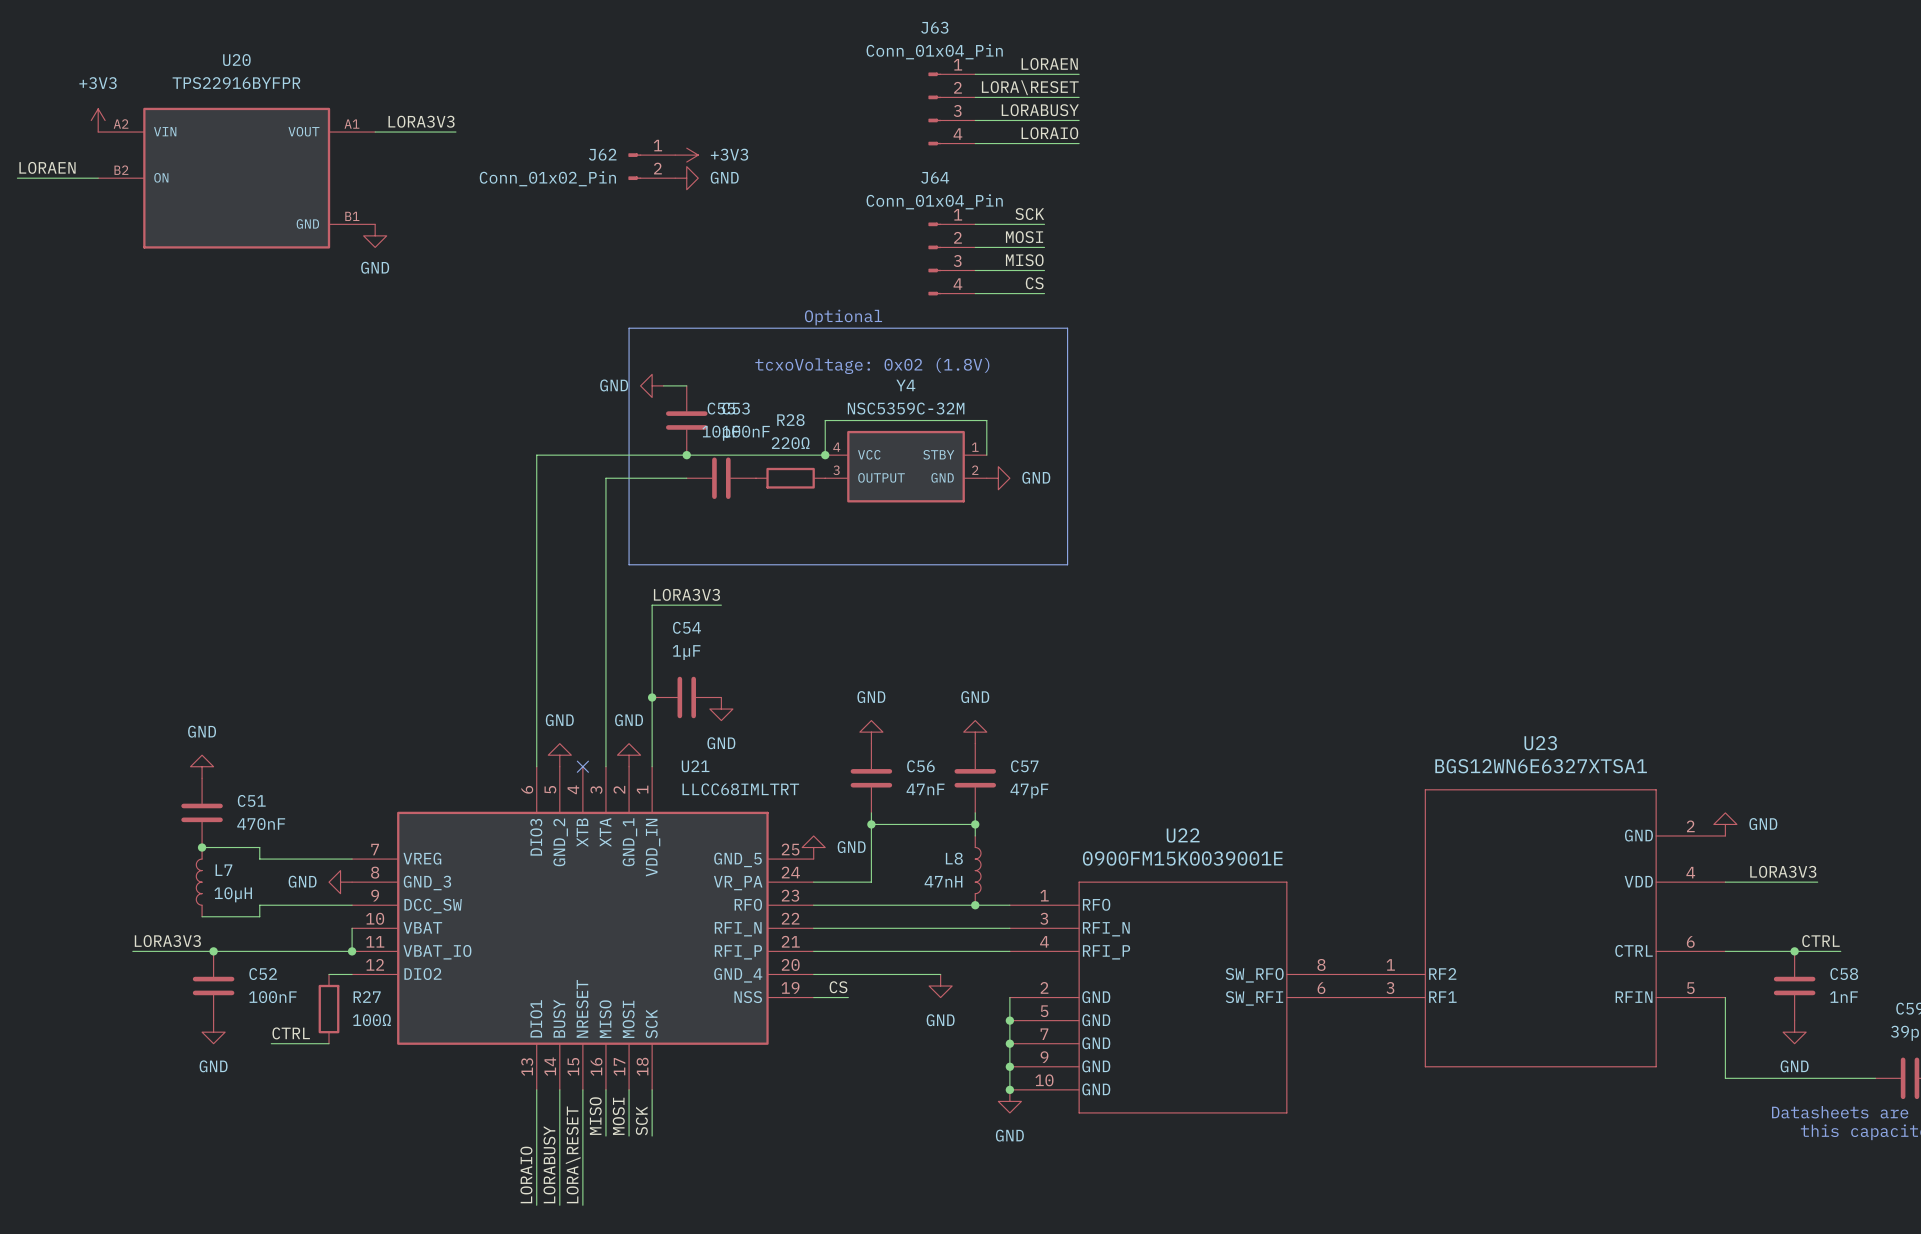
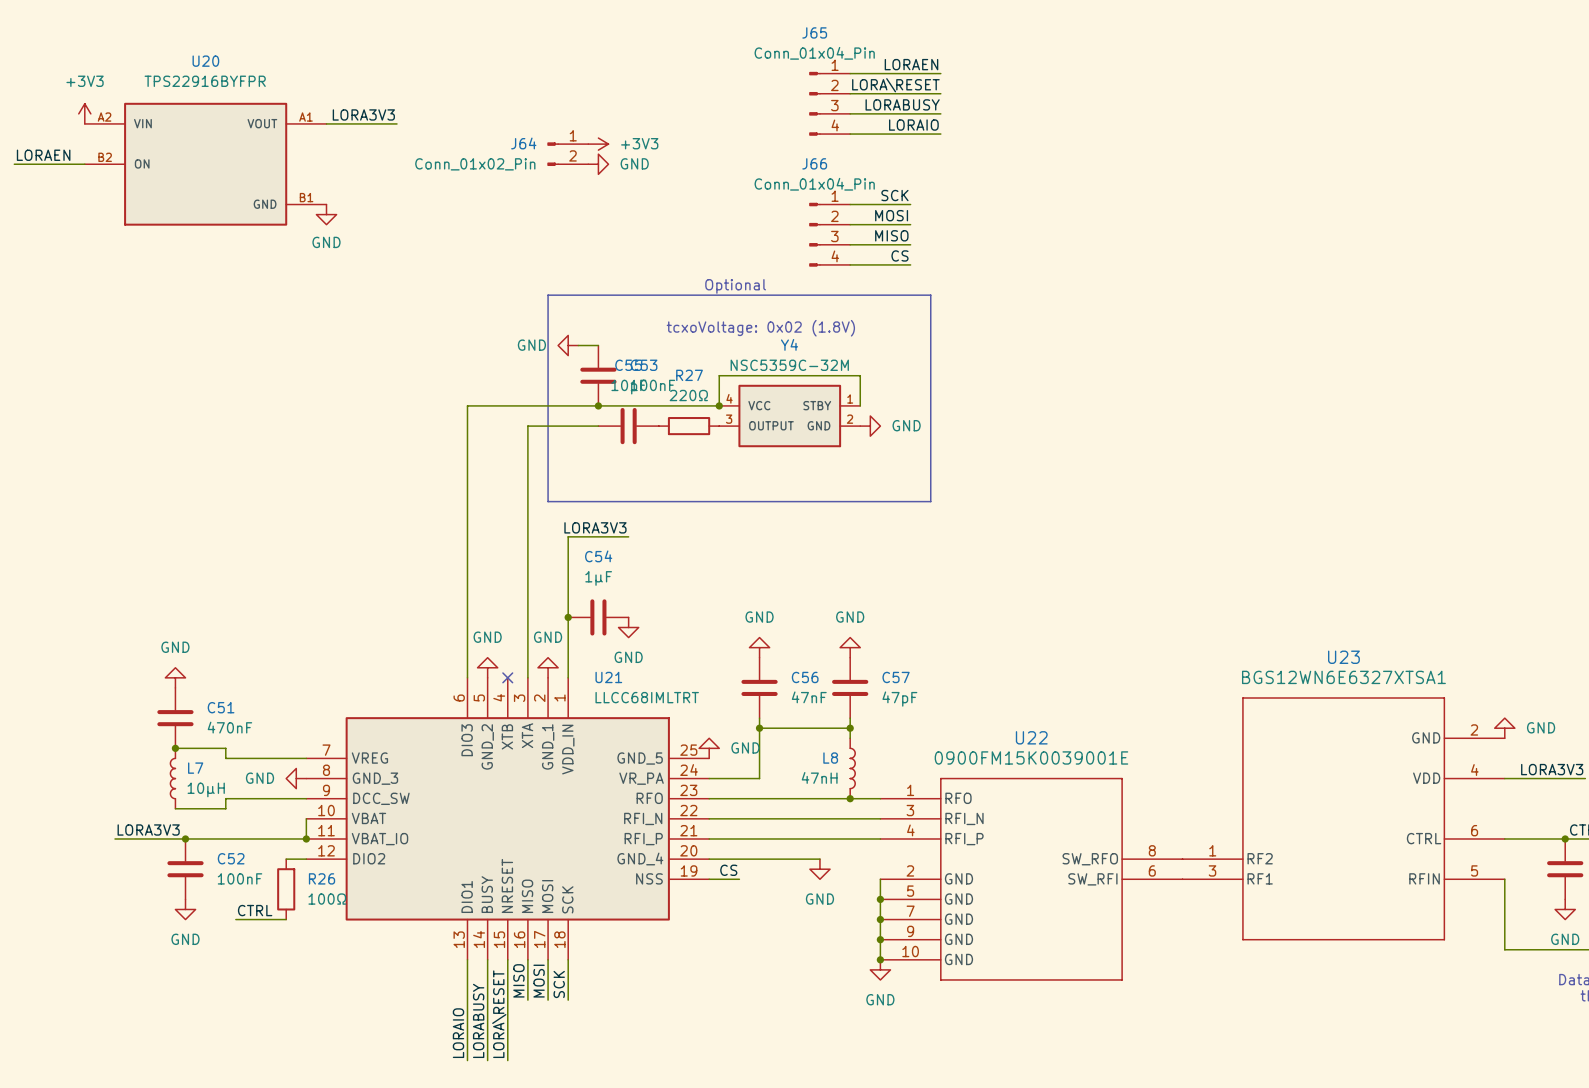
J63 name: J63 (934, 27) -> J65 (814, 32)
J62 name: J62 (602, 154) -> J64 (523, 143)
J64 name: J64 (935, 177) -> J66 (814, 163)
R28 name: R28 (790, 420) -> R27 (689, 375)
R27 name: R27 (367, 997) -> R26 (322, 878)

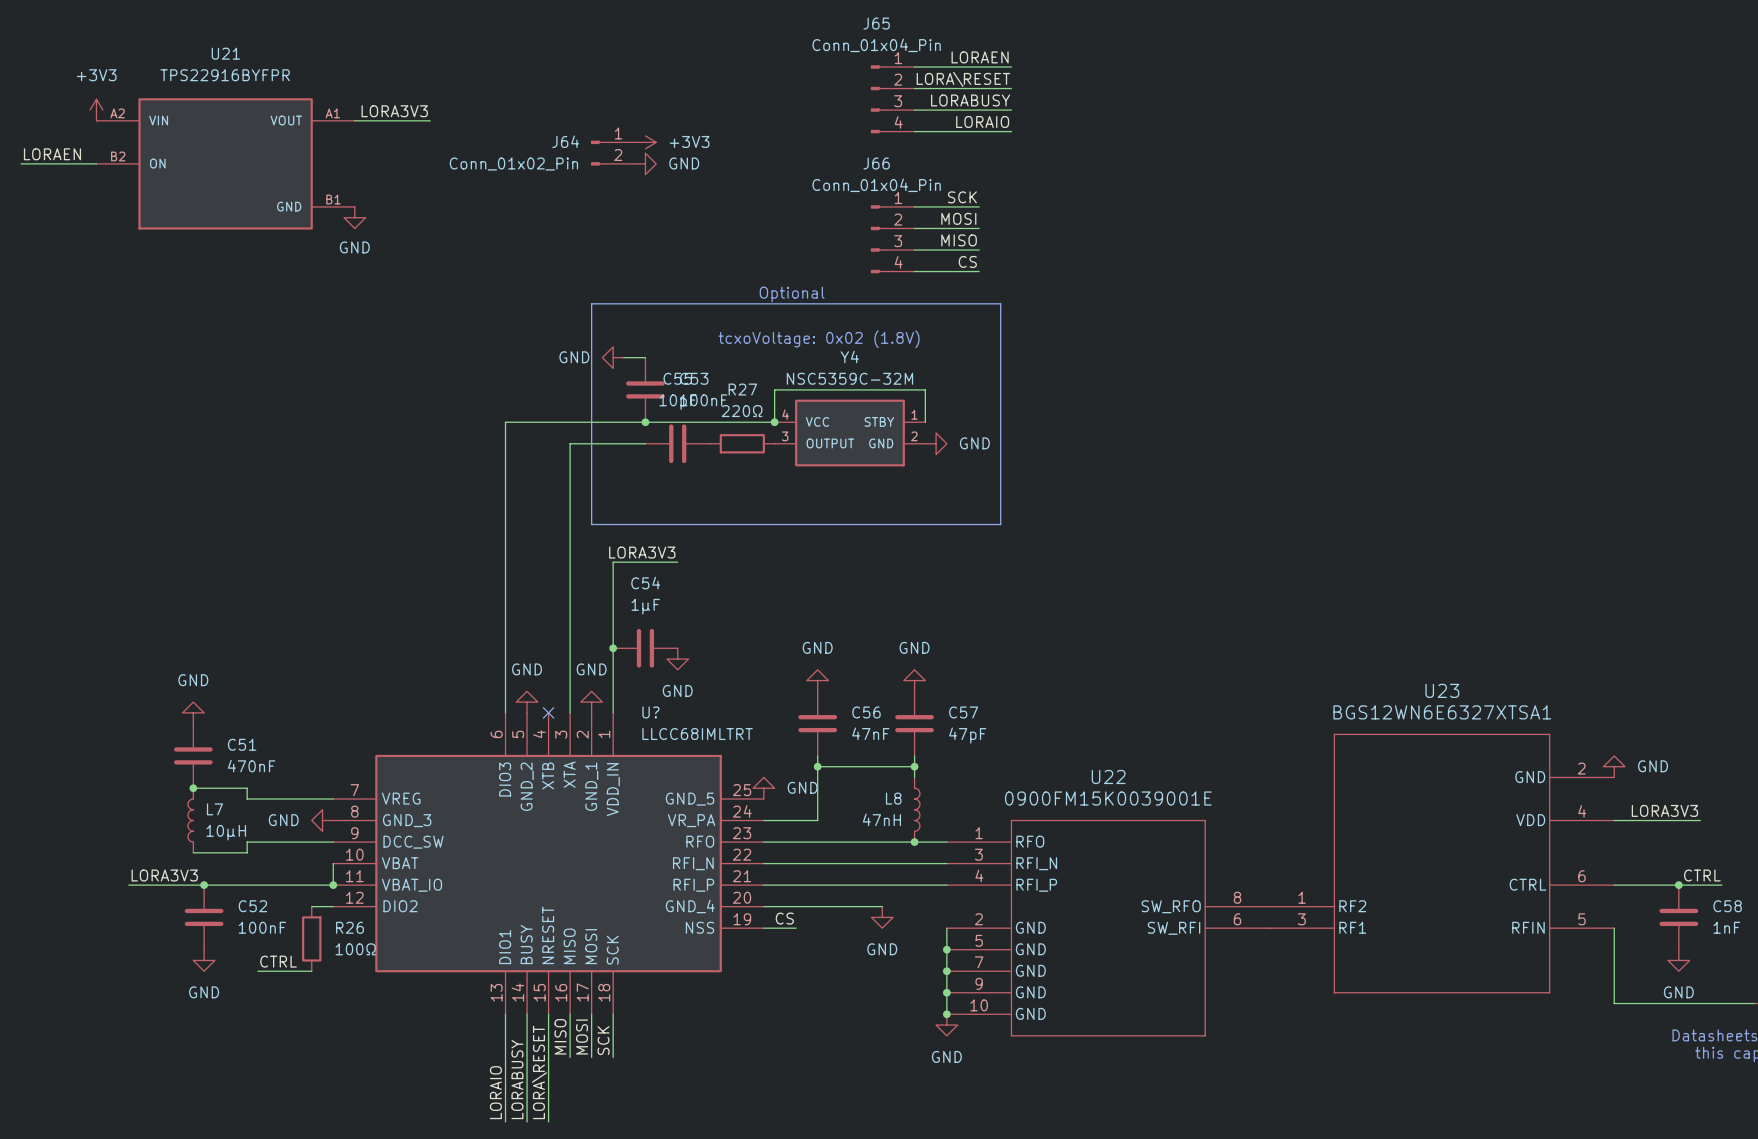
U20 name: U20 (205, 61) -> U21 (225, 53)
U21 name: U21 (608, 677) -> U? (650, 712)

